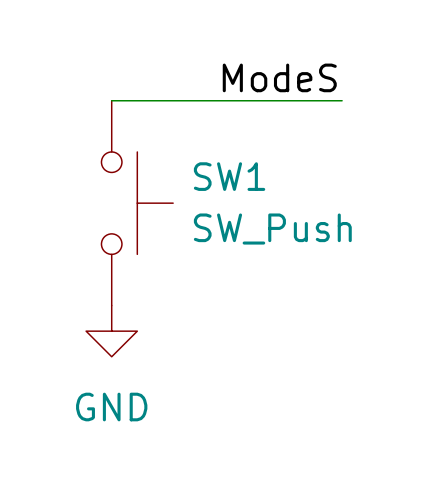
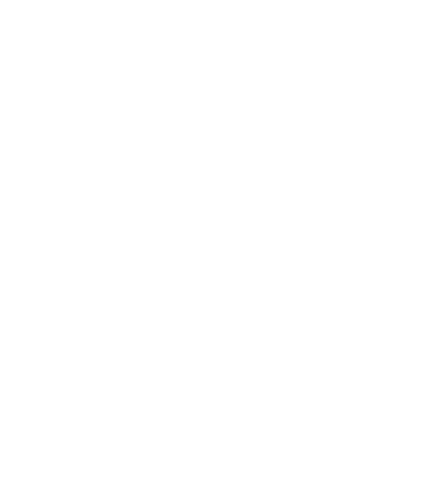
label: ModeS (279, 77) -> none
wire: (111, 100) (342, 100) -> none
SW1: SW_Push (137, 203) -> none
power symbol: GND (111, 331) -> none

